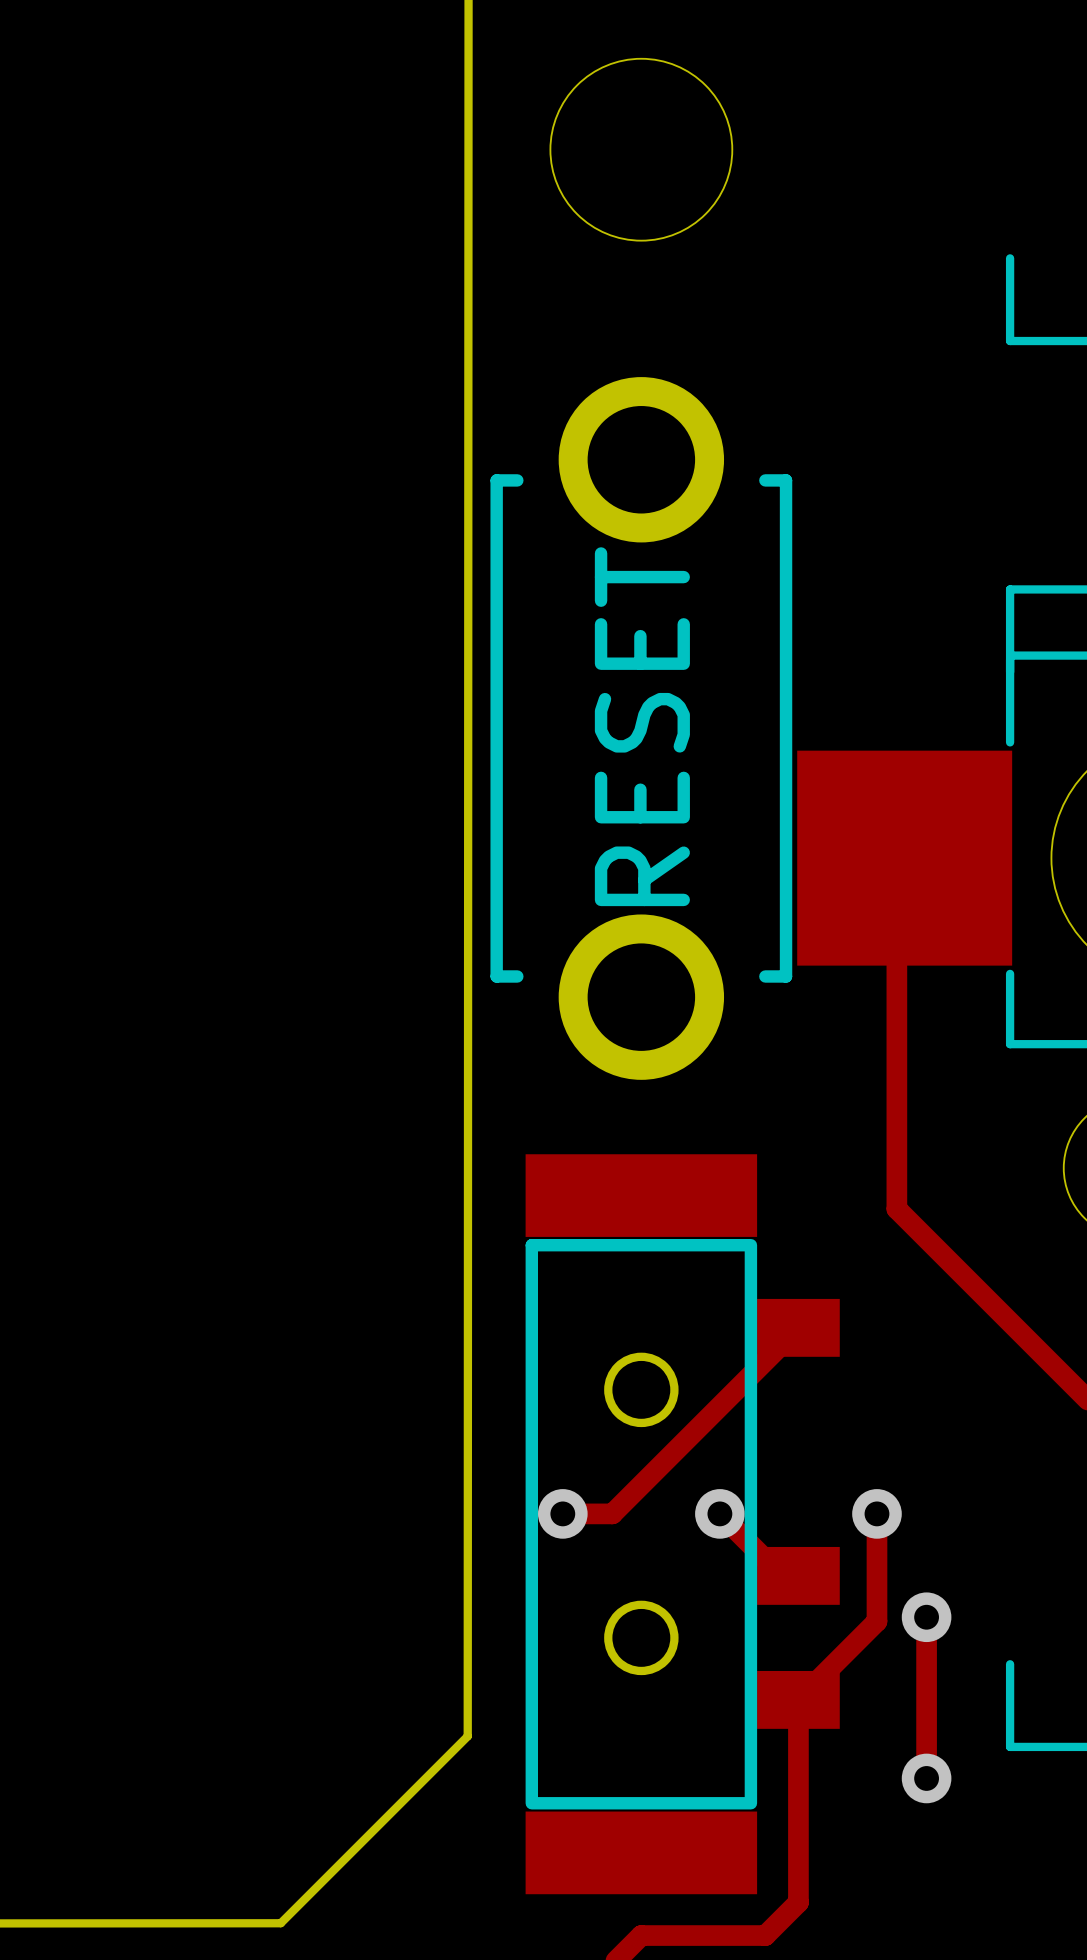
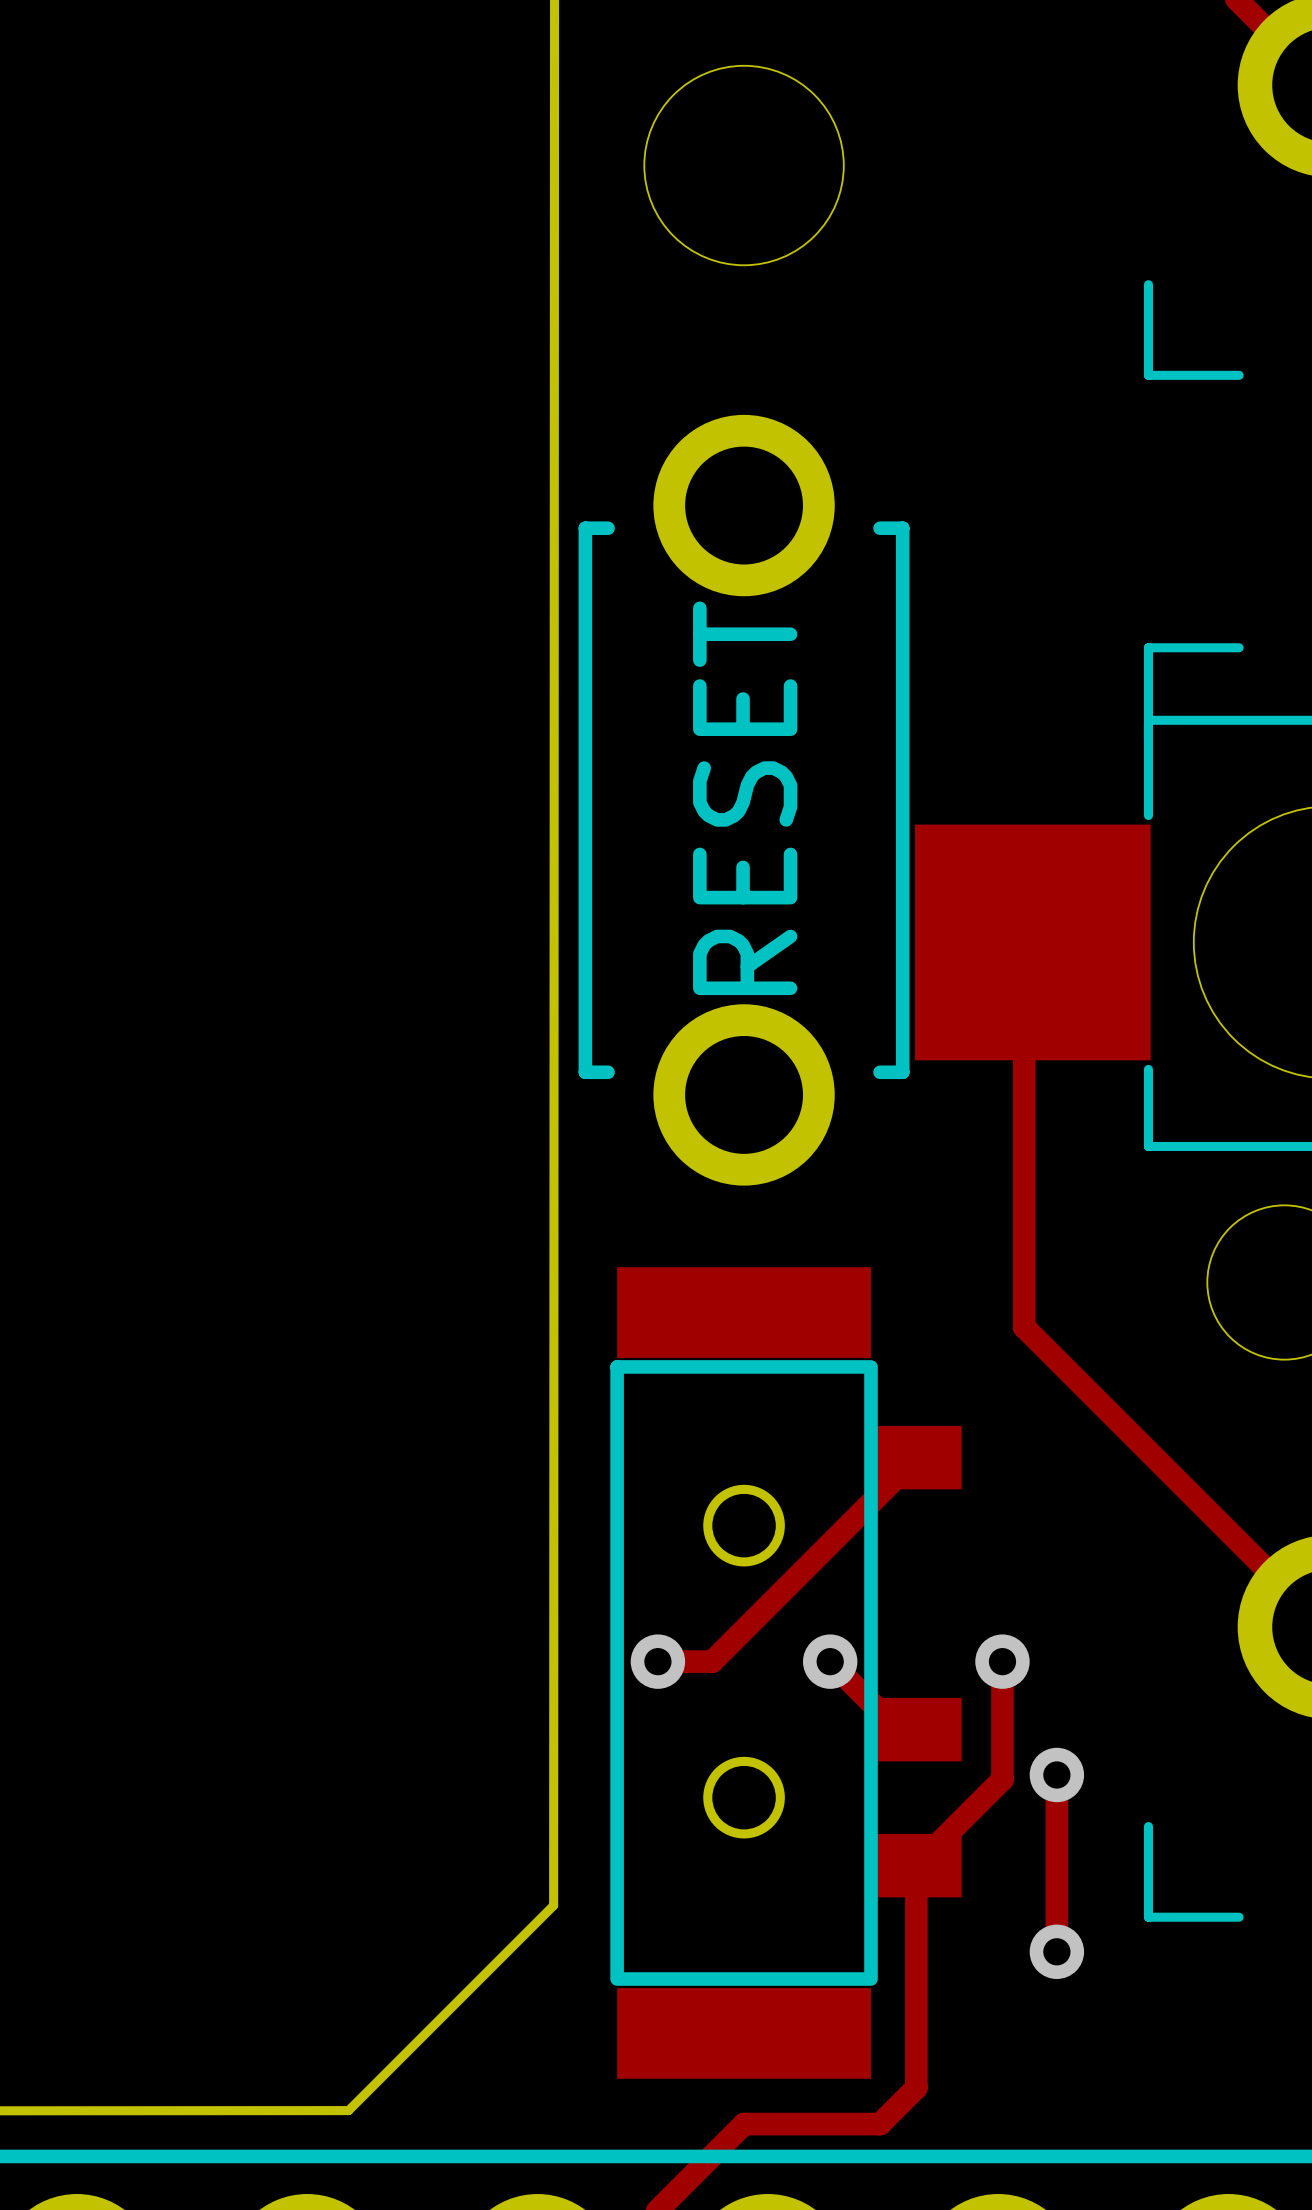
part footprint: [525, 1154, 840, 1895] -> [610, 1267, 962, 2079]

